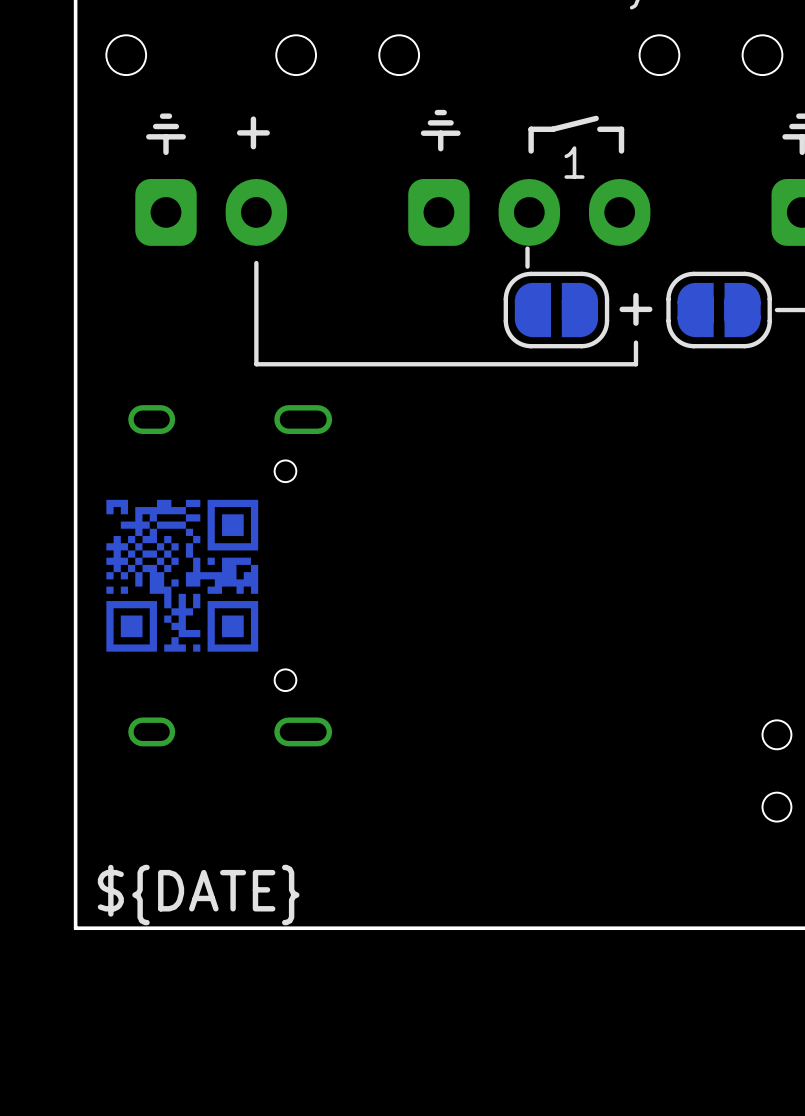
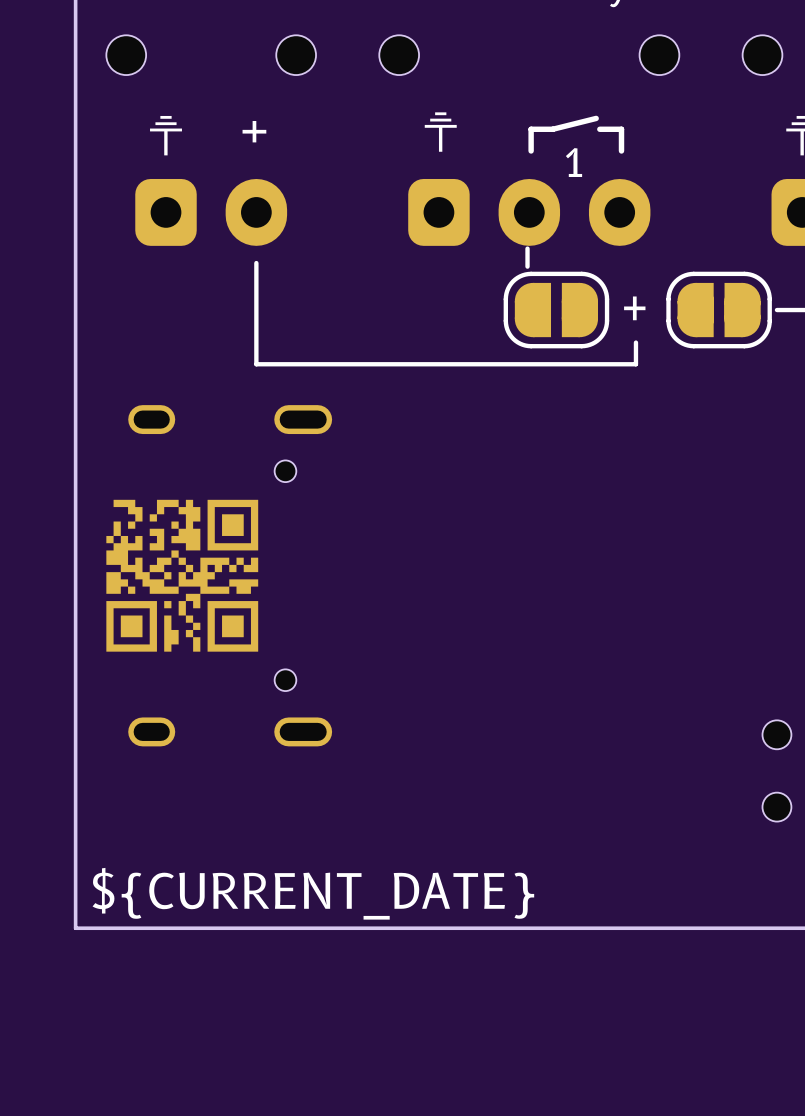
part footprint: [106, 499, 259, 652] -> [106, 499, 259, 652]
text: ${DATE} (198, 895) -> ${CURRENT_DATE} (313, 893)

